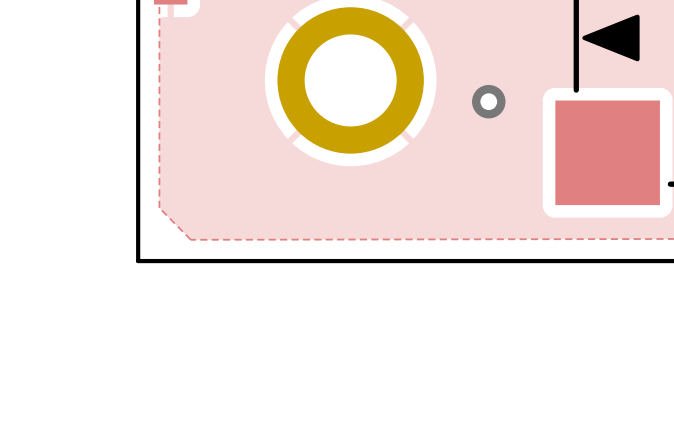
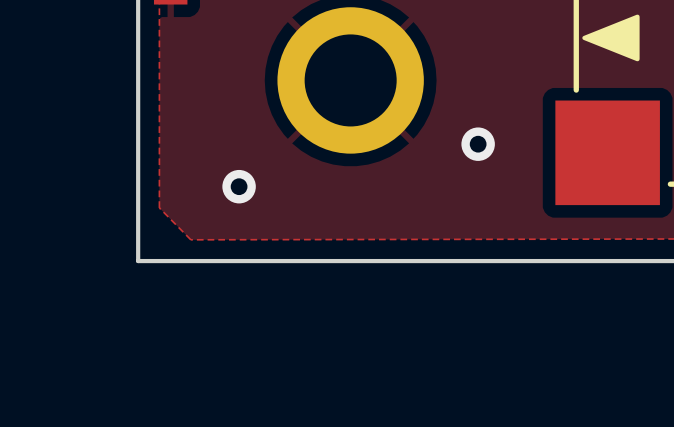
via position: (488, 101) -> (478, 144)
via: none -> (239, 186)

